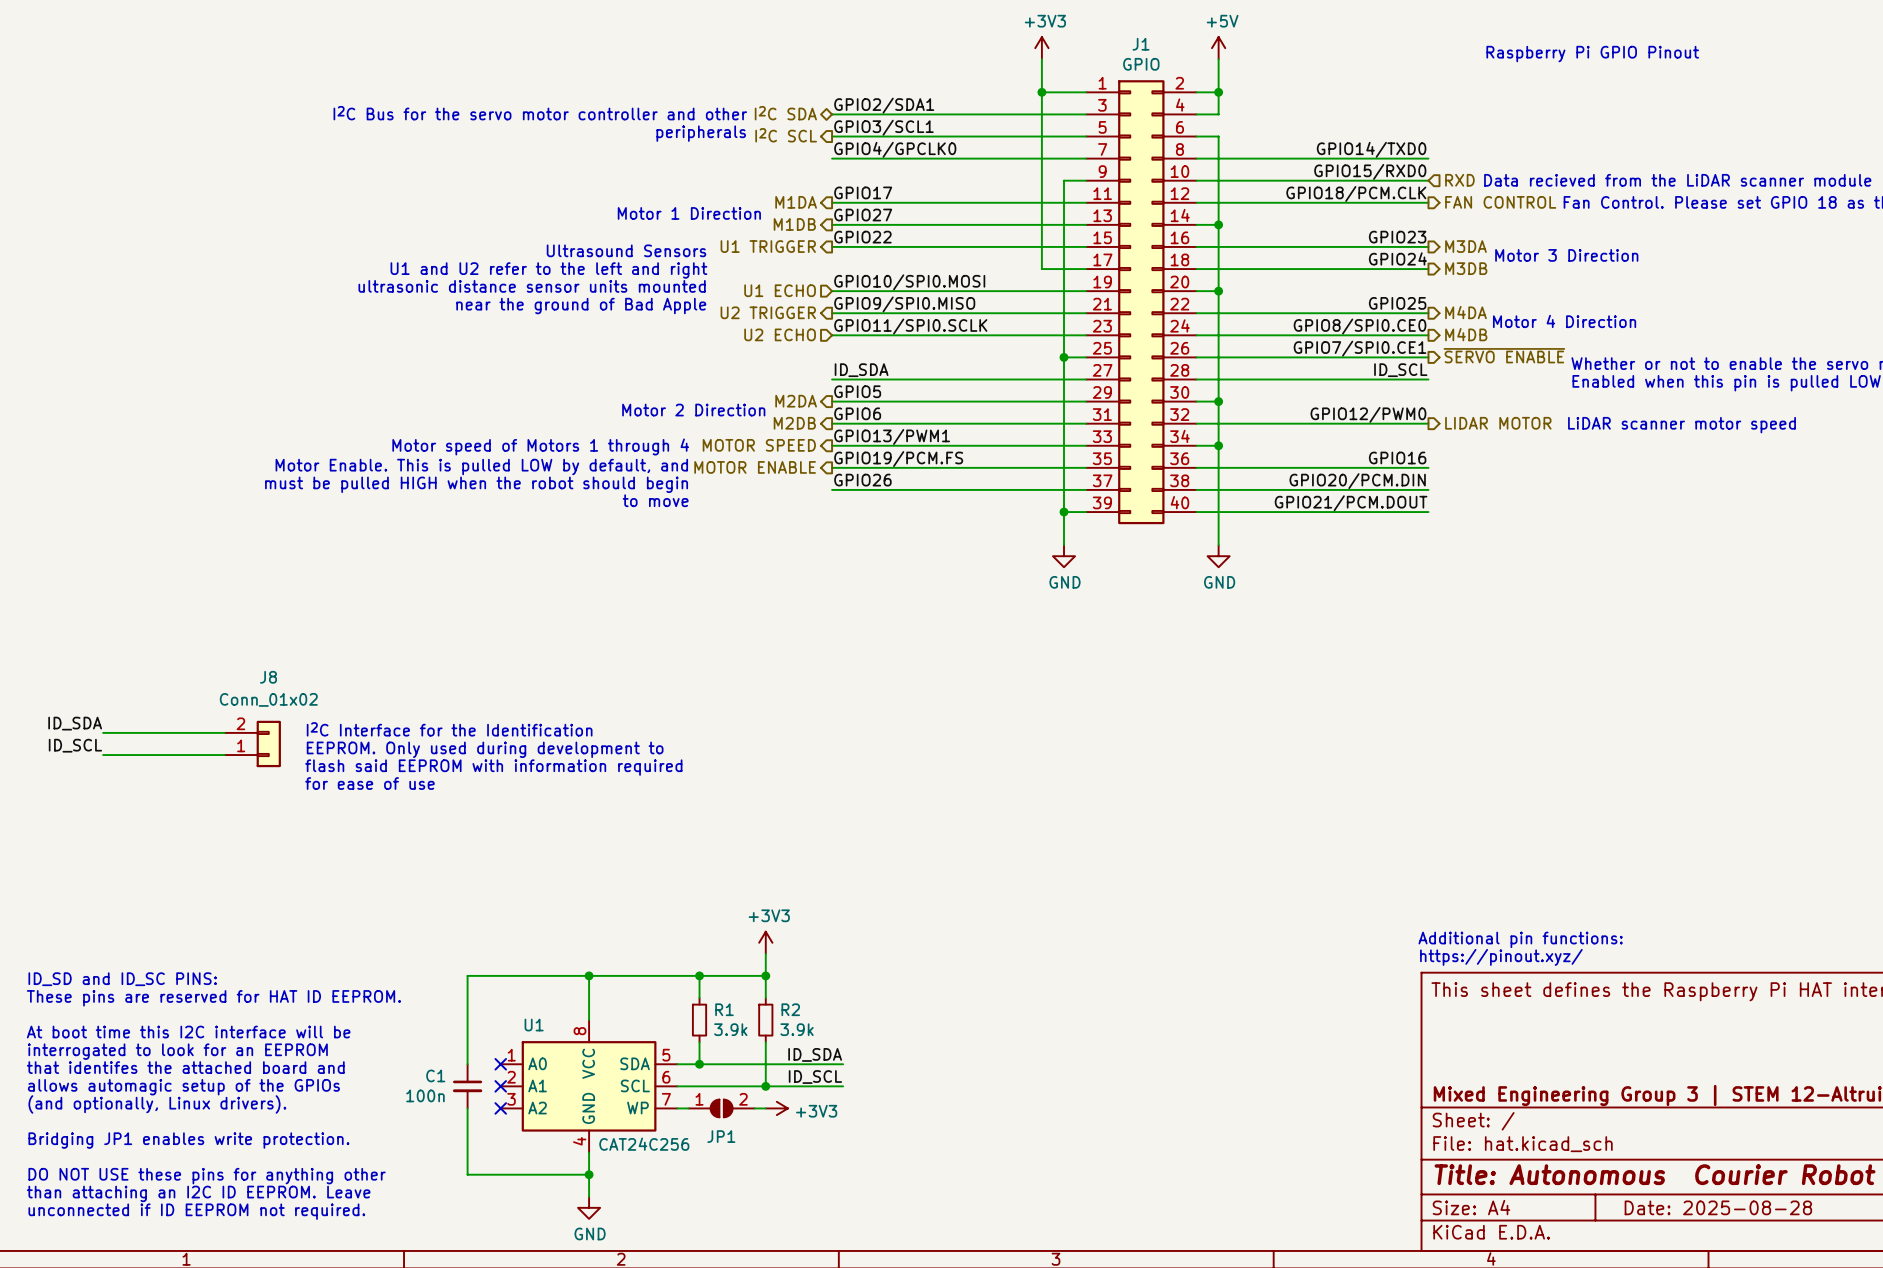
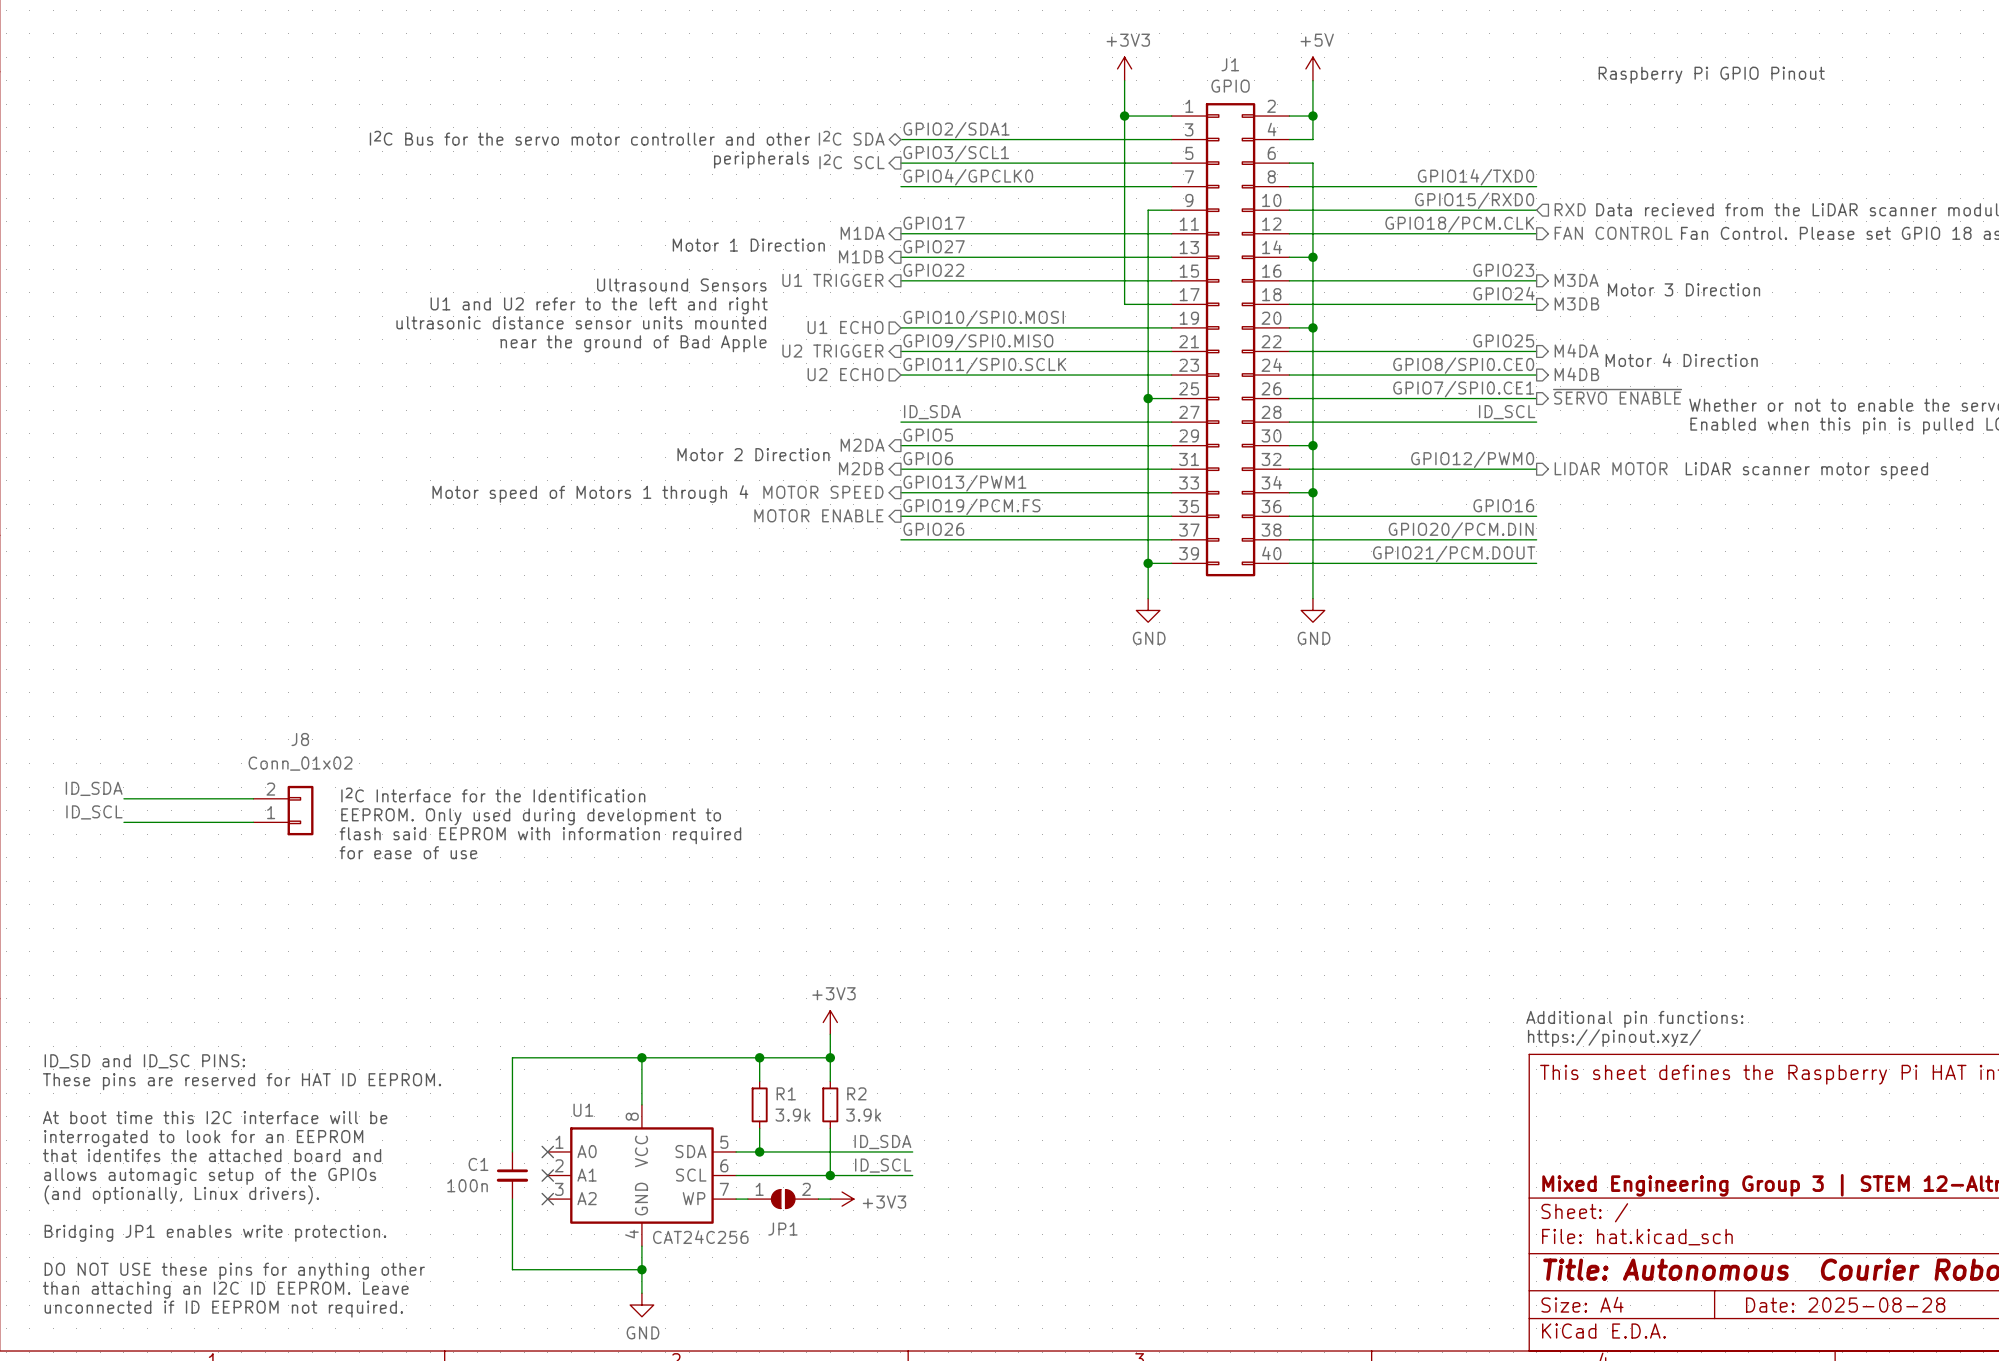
text: Motor Enable. This is pulled LOW by default, and (481, 467) -> none
text: must be pulled HIGH when the robot should begin (476, 484) -> none
text: to move (655, 500) -> none

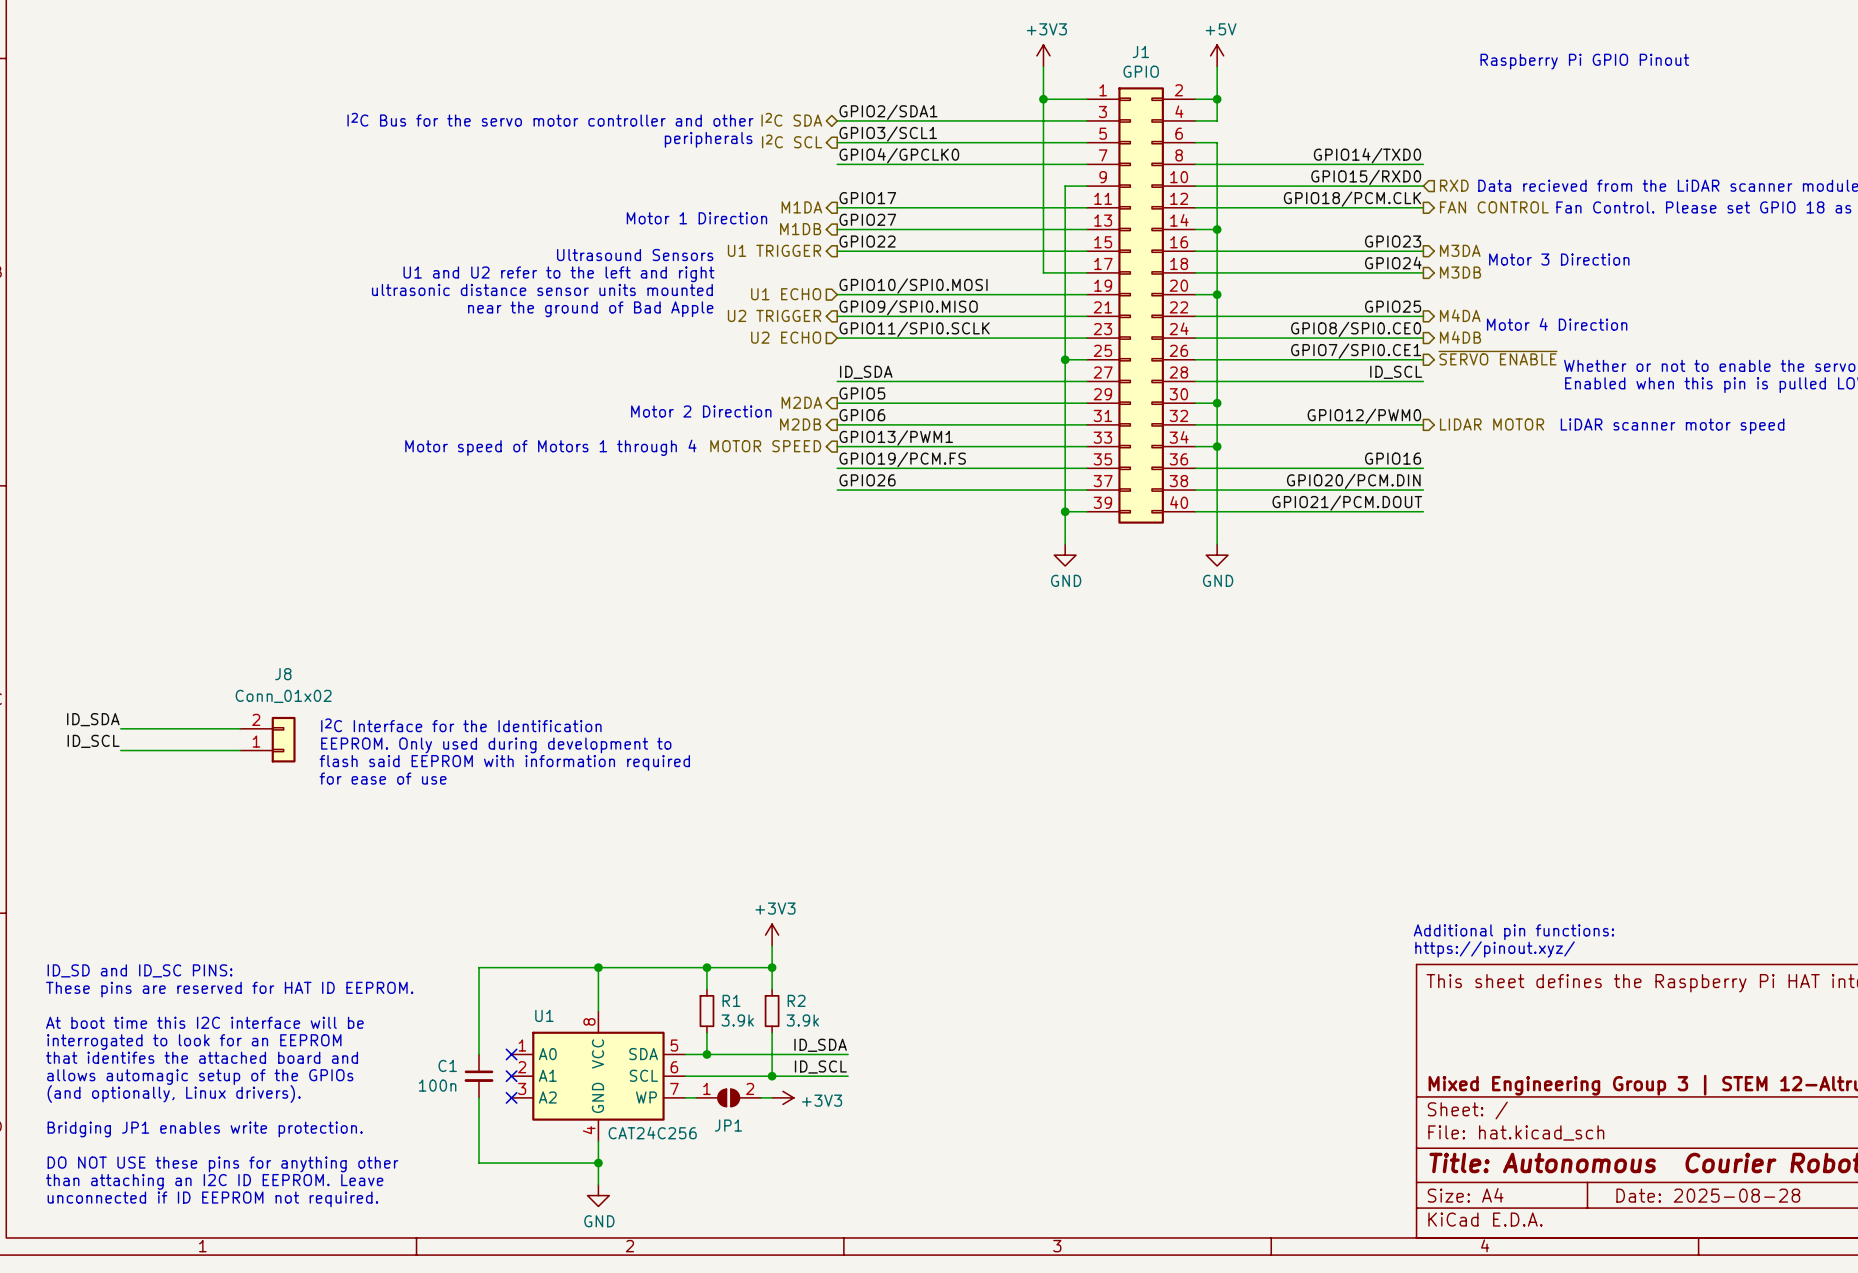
hierarchical label: MOTOR ENABLE (818, 515) -> none

